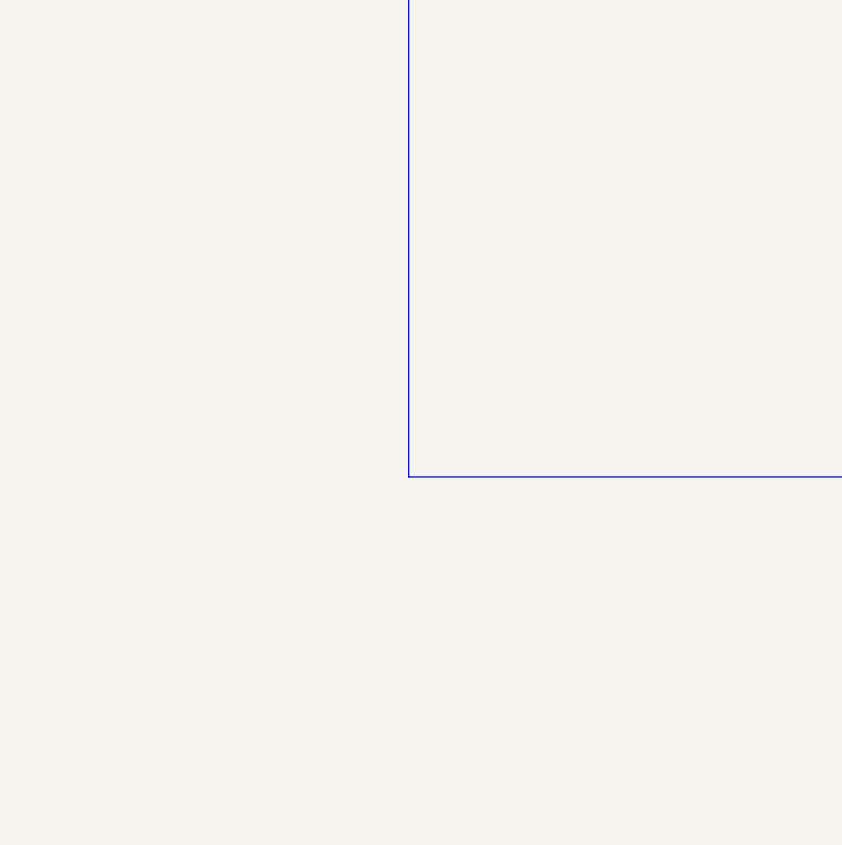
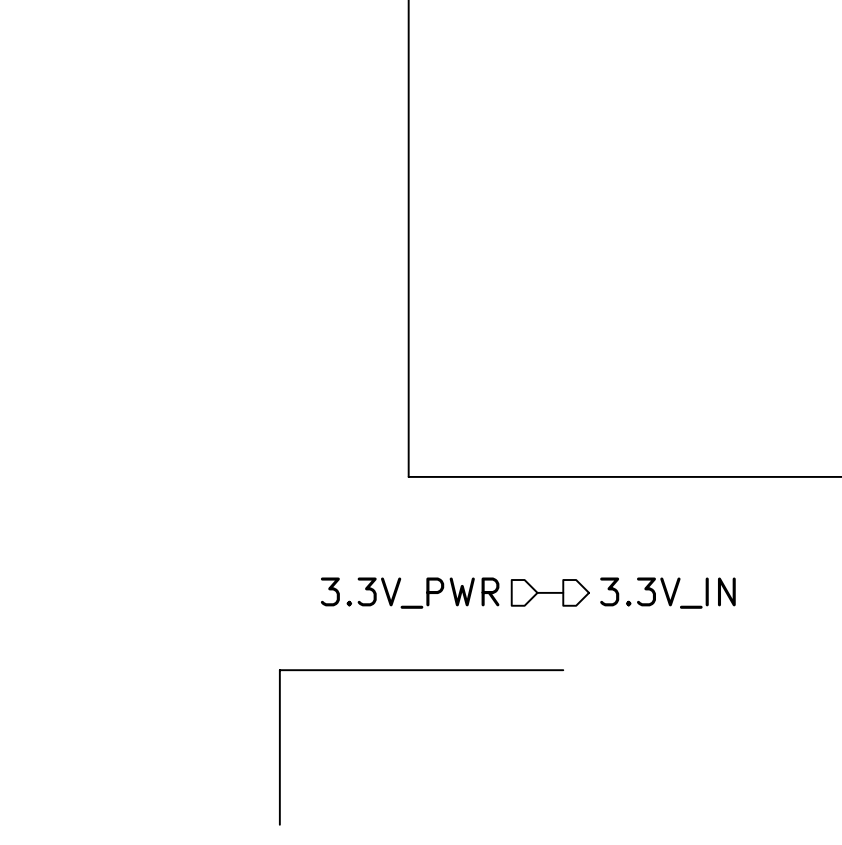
wire: none -> (537, 592) (563, 592)
hierarchical label: none -> 3.3V_PWR (410, 593)
sheet pin: none -> 3.3V_IN (667, 593)
wire: none -> (563, 670) (279, 670) (279, 824)

